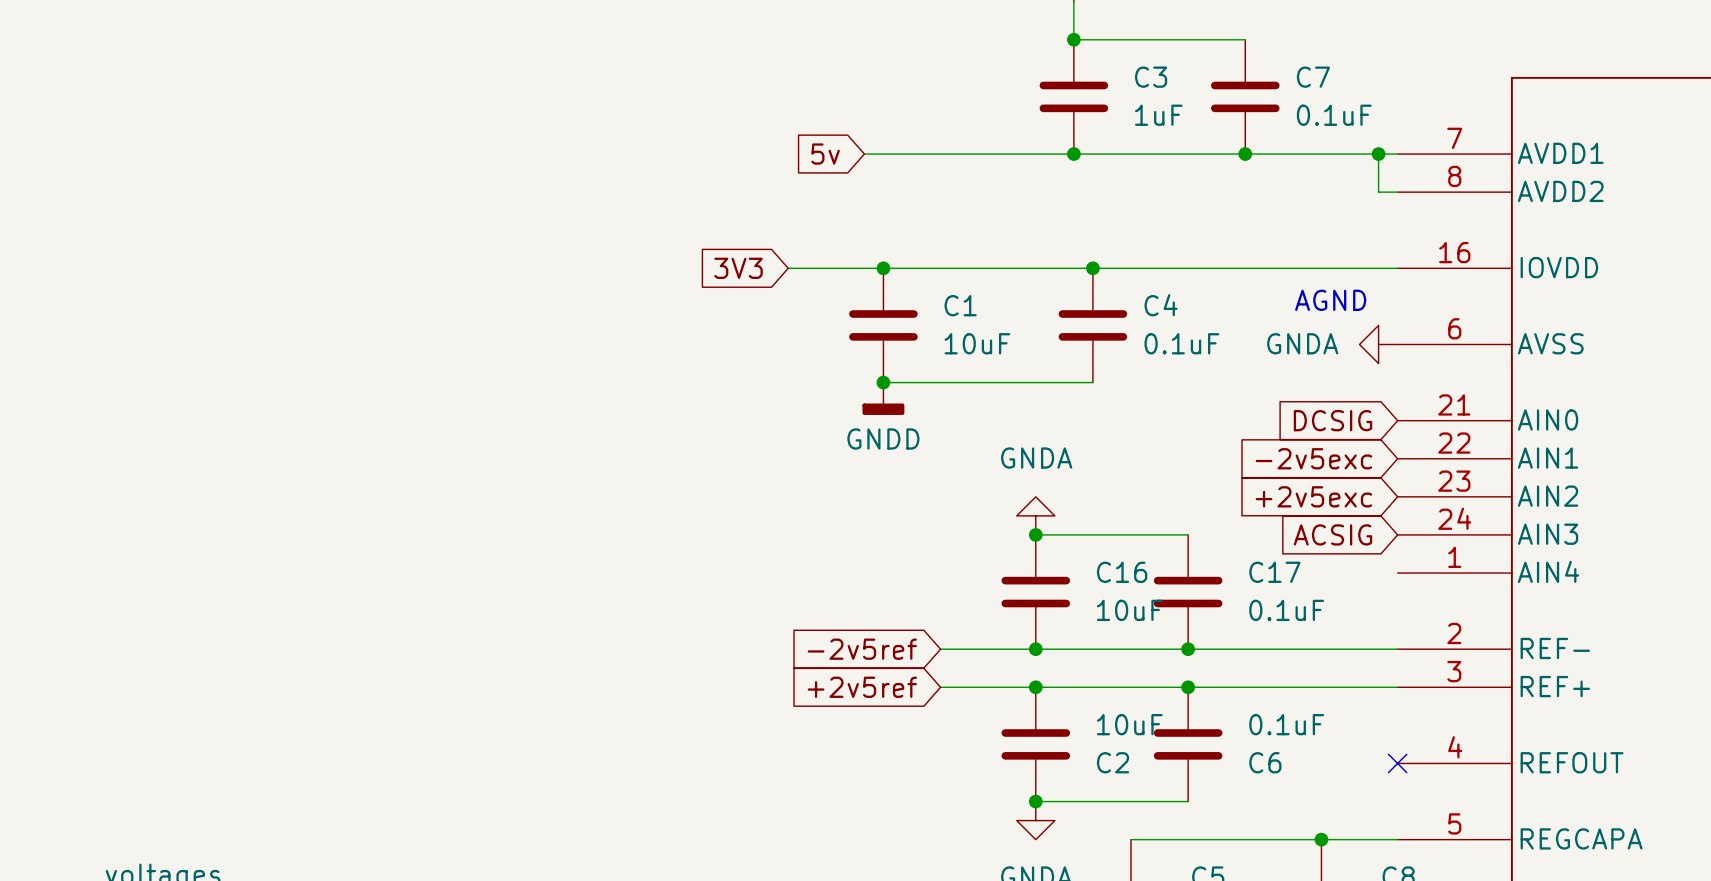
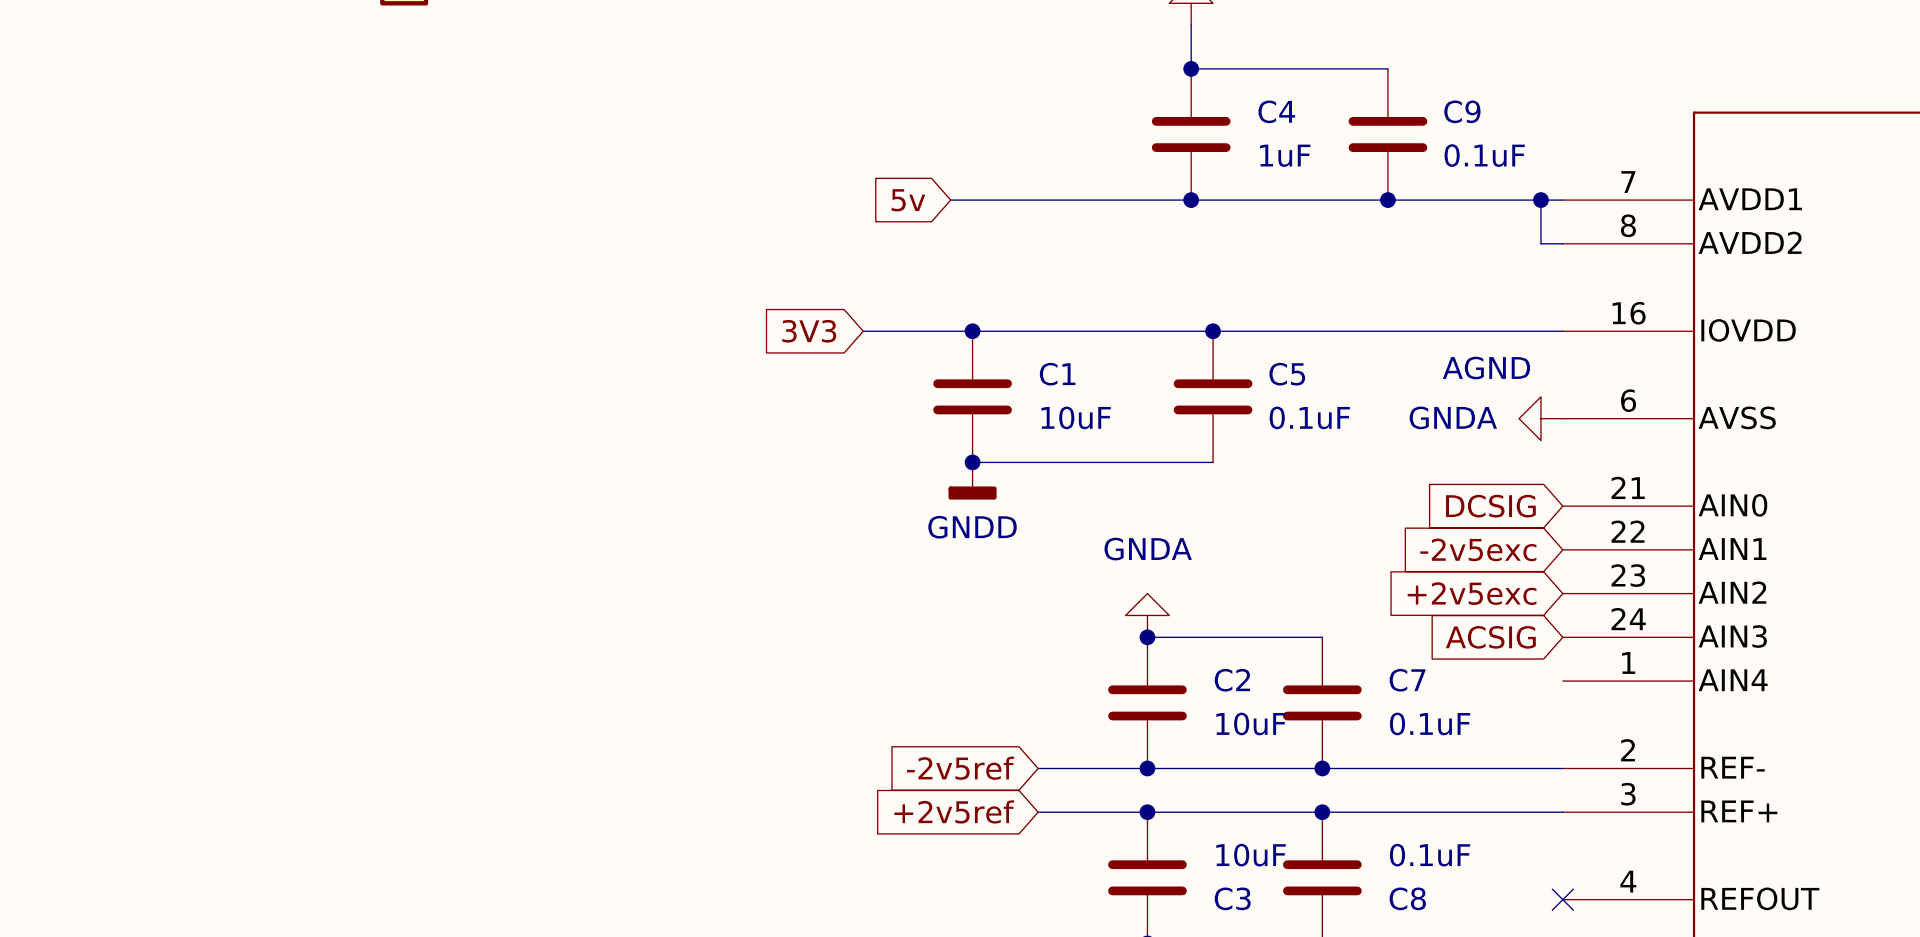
C3 name: C3 (1151, 77) -> C4 (1276, 111)
C7 name: C7 (1313, 77) -> C9 (1462, 111)
C4 name: C4 (1161, 305) -> C5 (1287, 374)
C16 name: C16 (1122, 572) -> C2 (1232, 680)
C17 name: C17 (1274, 572) -> C7 (1407, 680)
C2 name: C2 (1113, 762) -> C3 (1232, 898)
C6 name: C6 (1265, 762) -> C8 (1407, 898)

